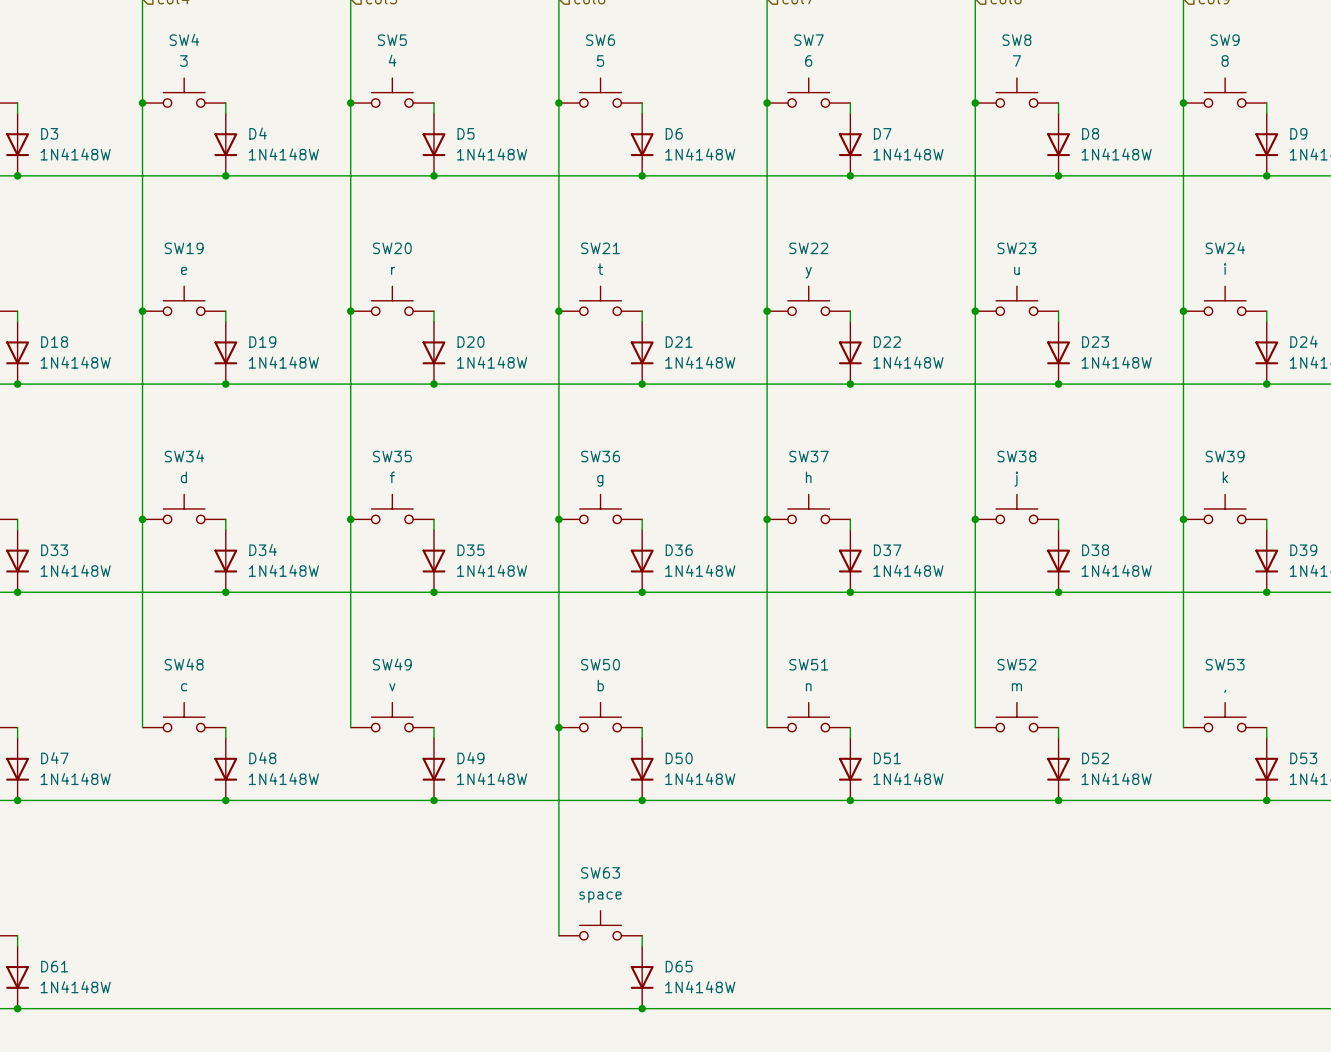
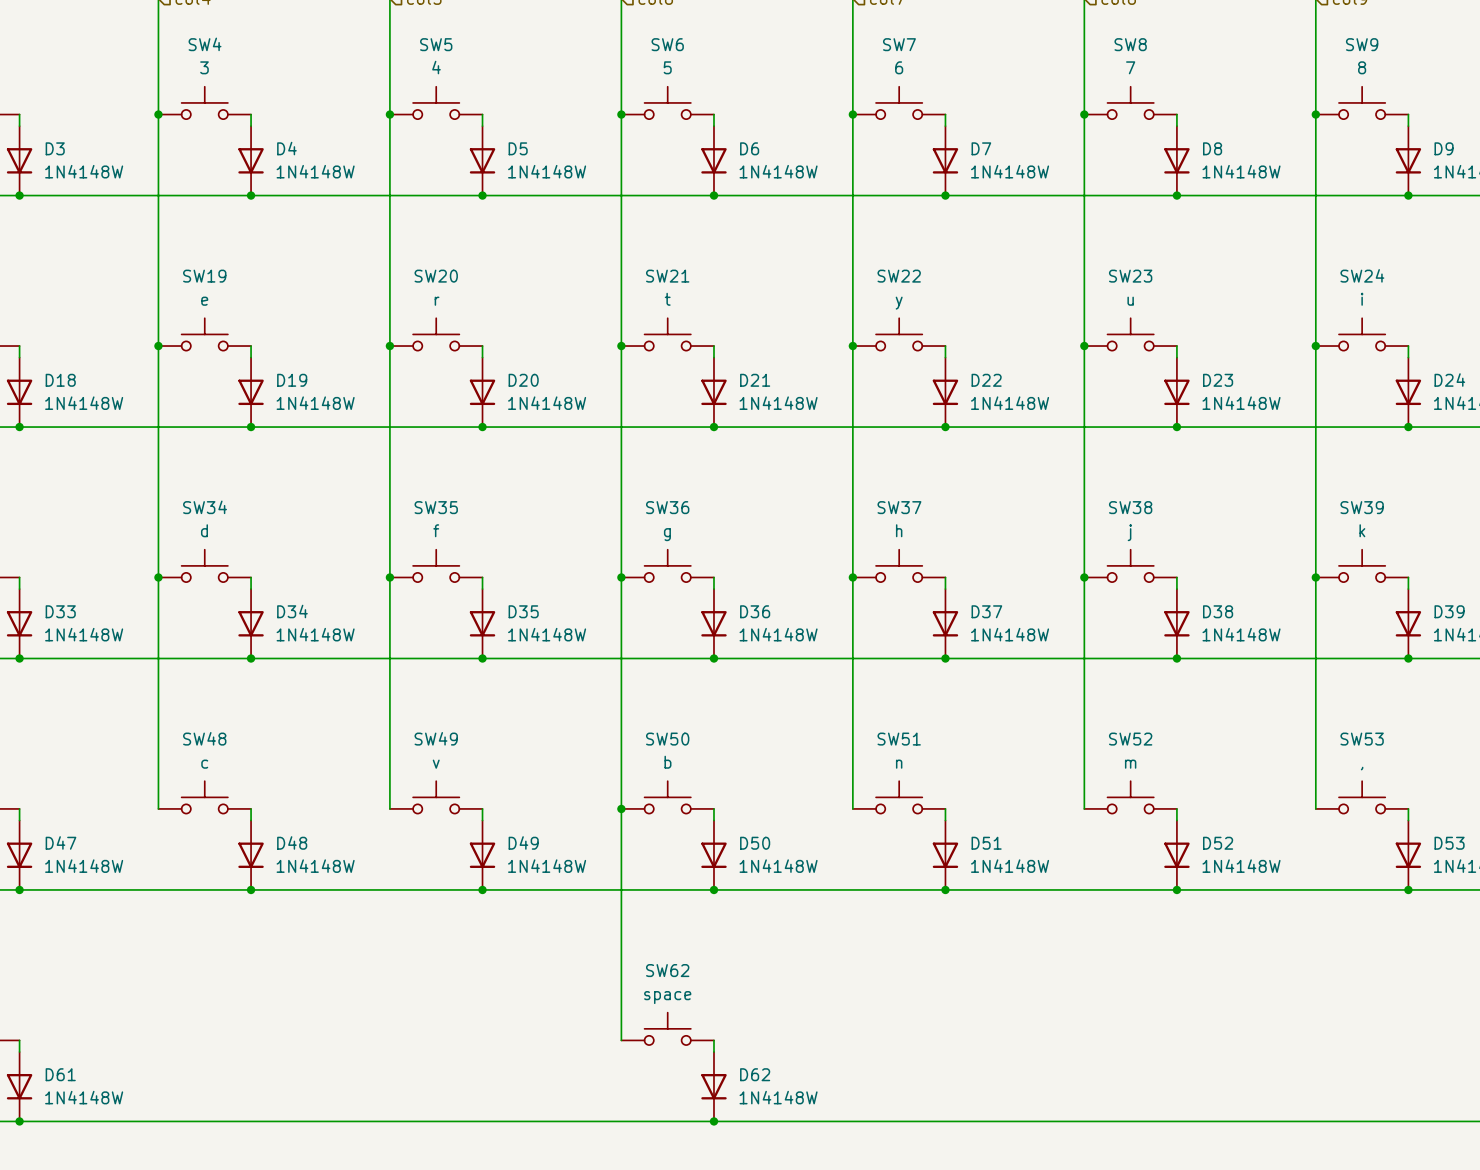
SW63 name: SW63 (600, 872) -> SW62 (667, 970)
D65 name: D65 (679, 966) -> D62 (755, 1074)

